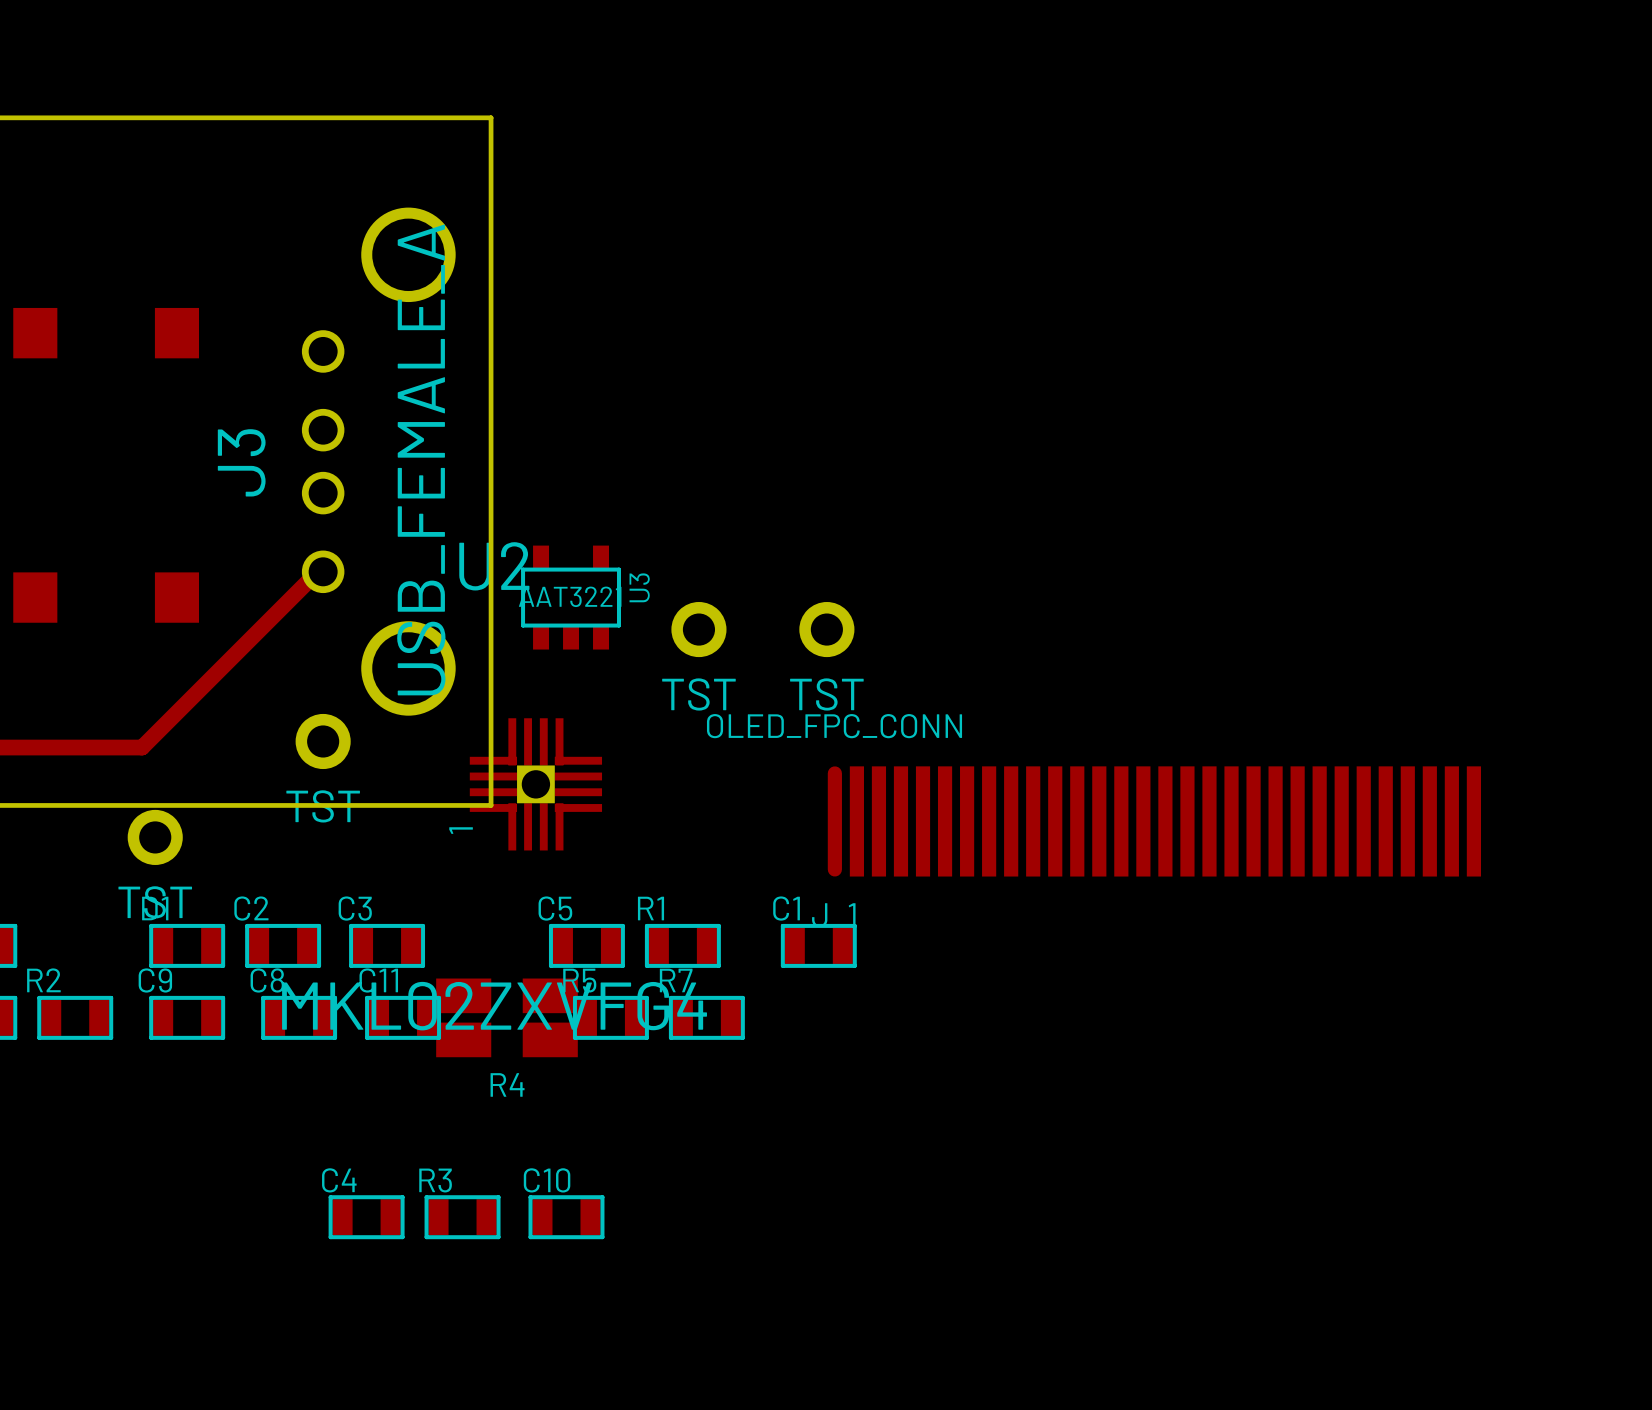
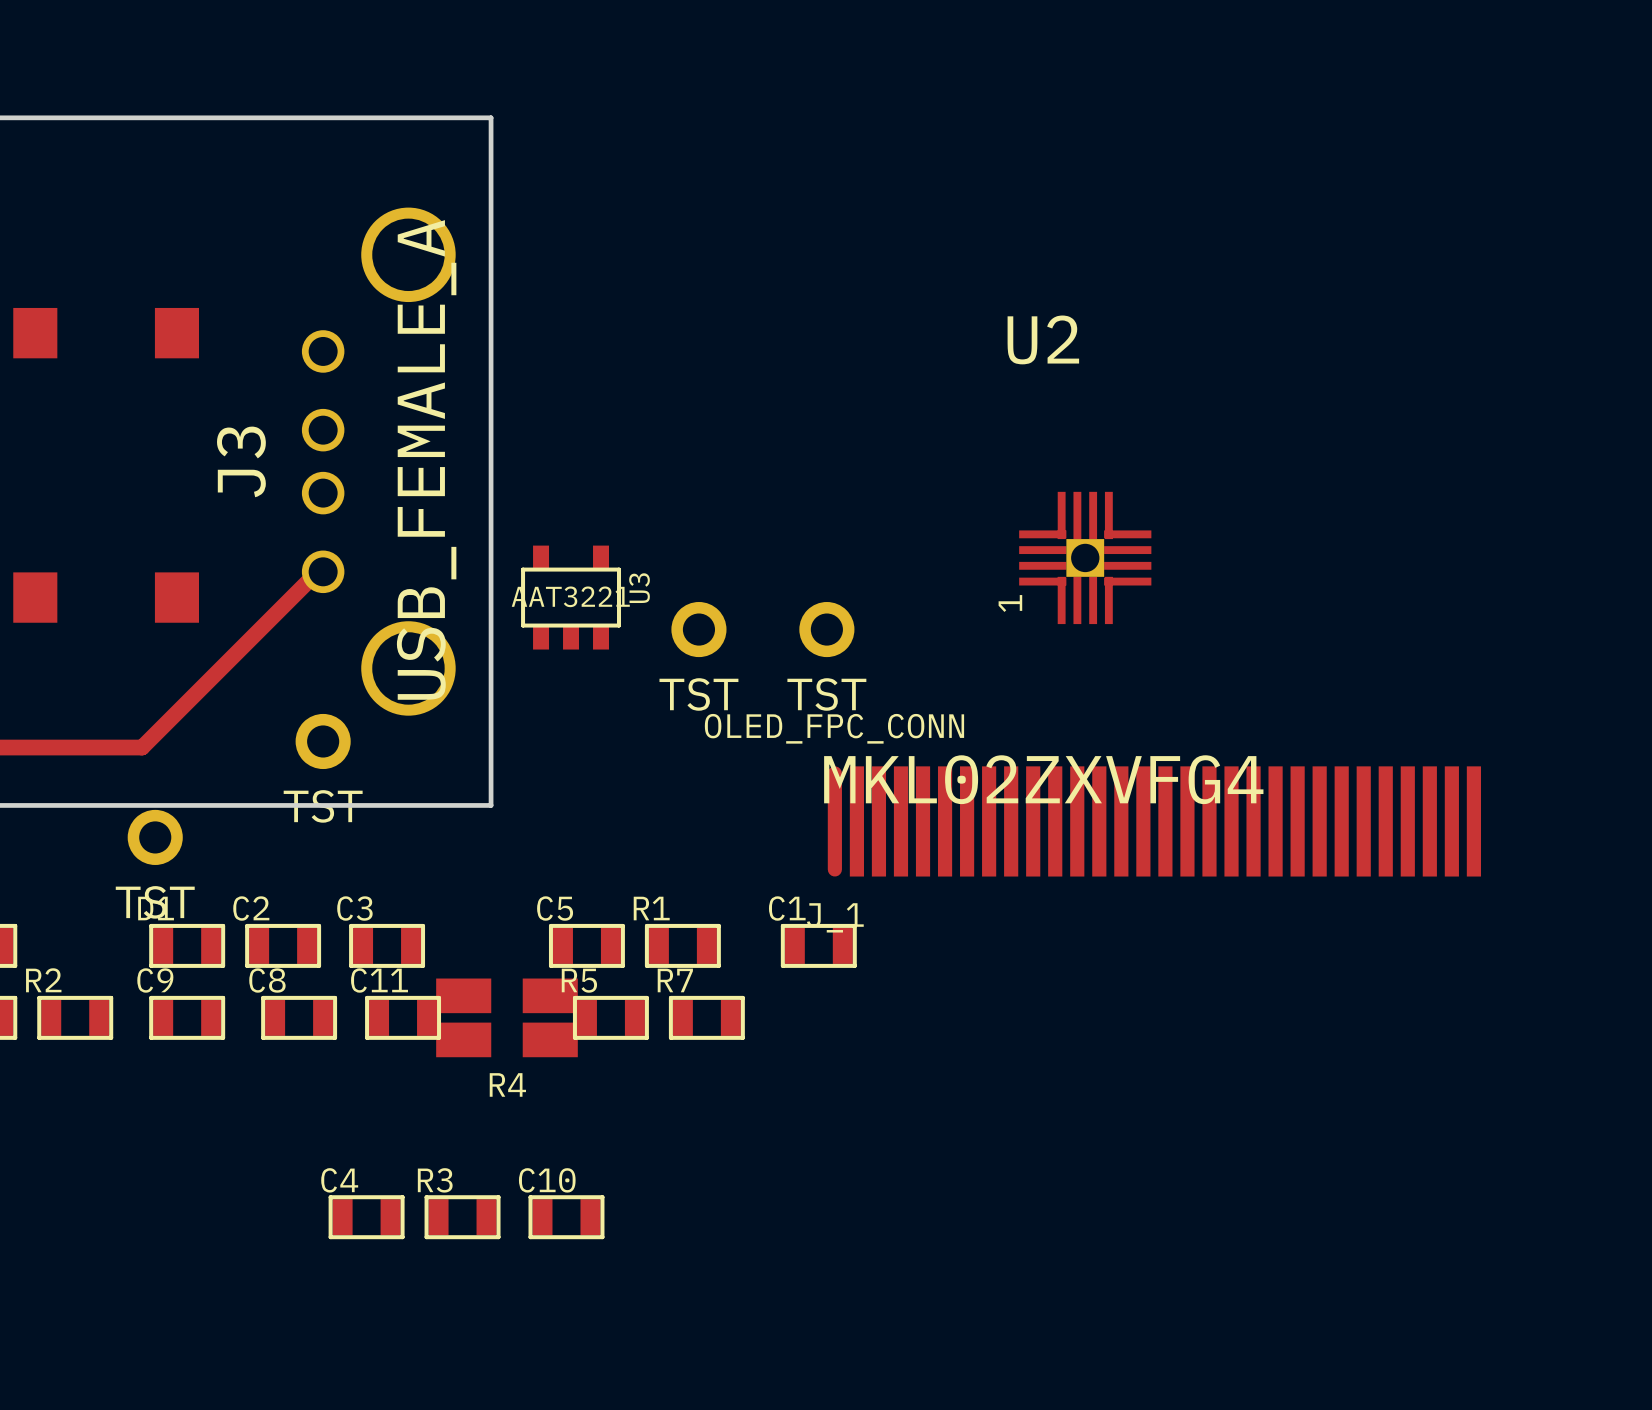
U2 position: (535, 784) -> (1085, 557)

